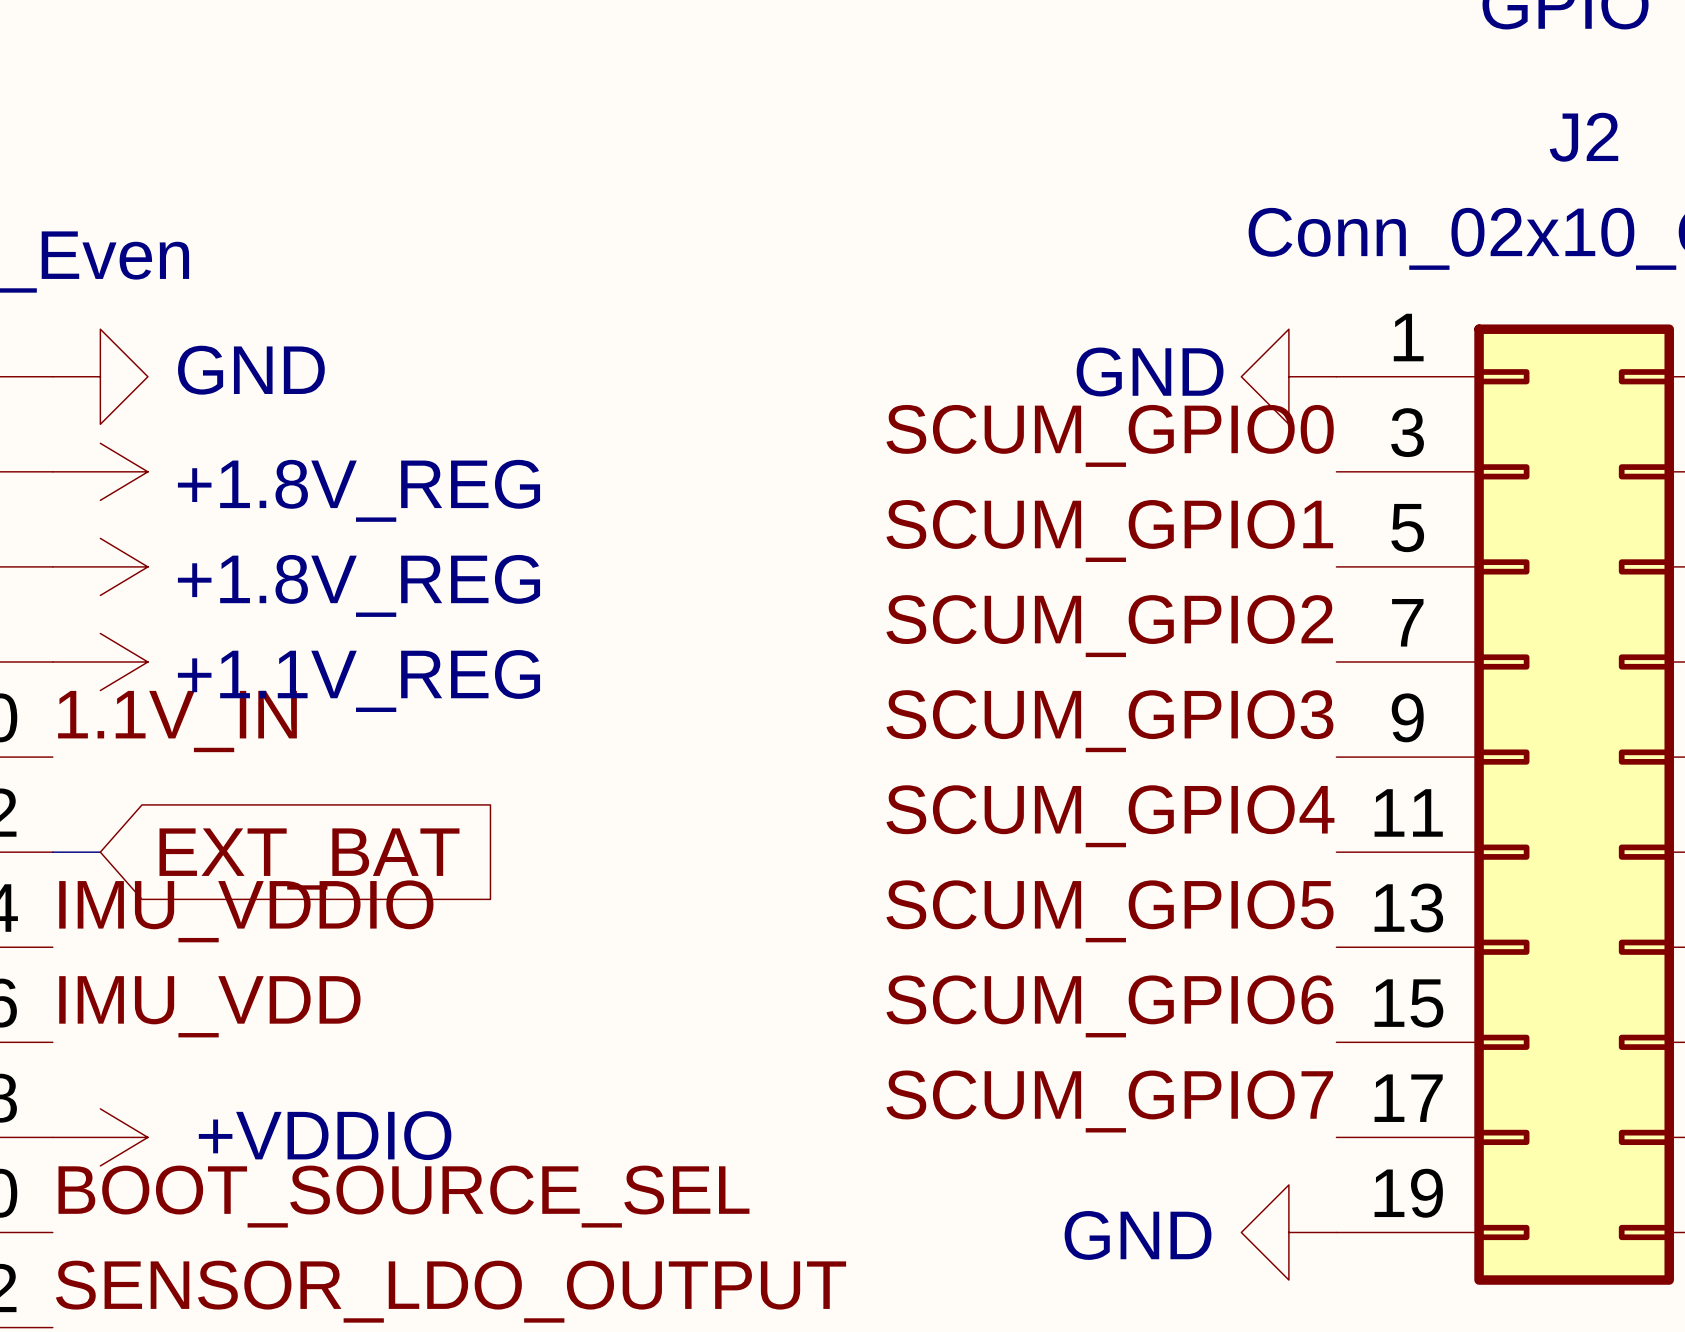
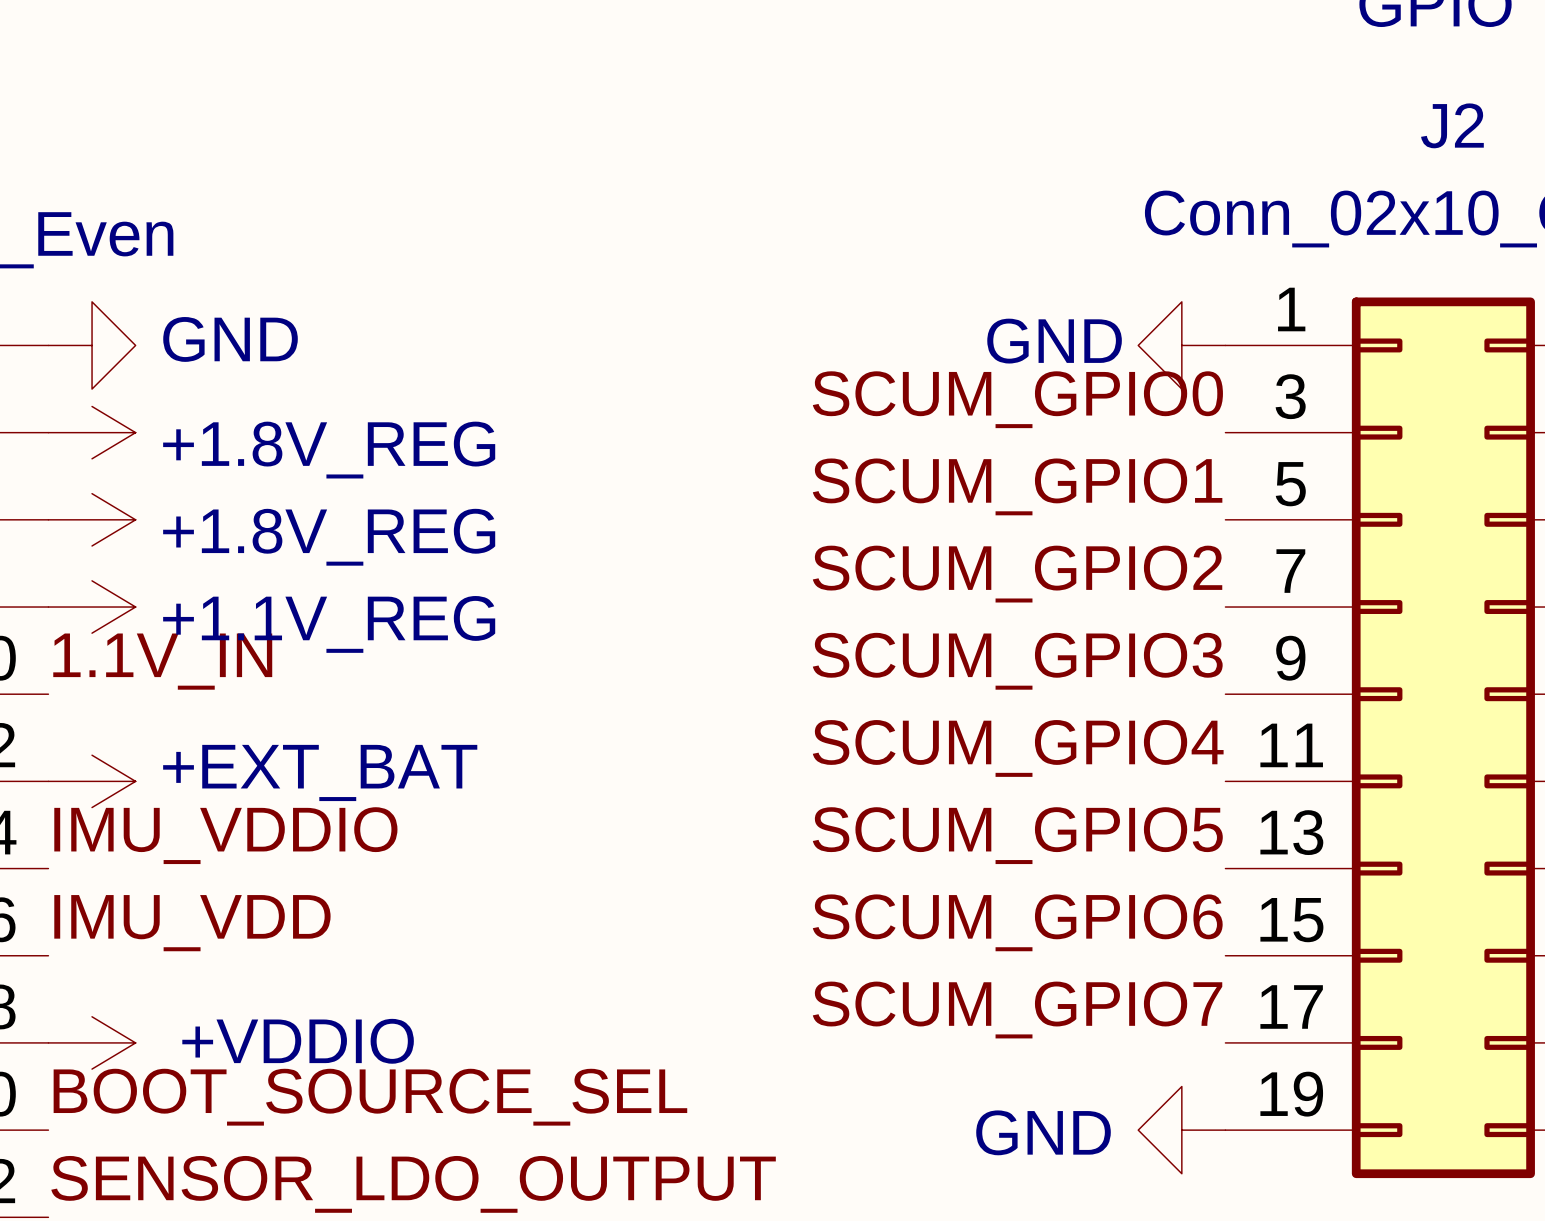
power symbol: none -> +EXT_BAT (92, 781)
global label: EXT_BAT (309, 859) -> none

